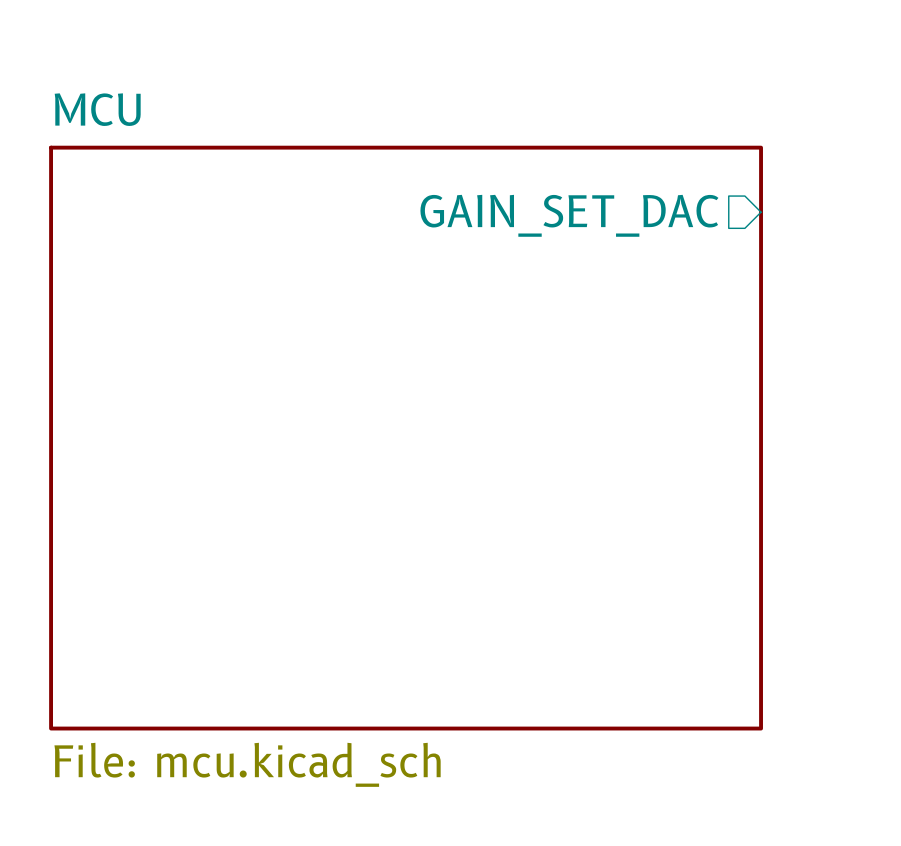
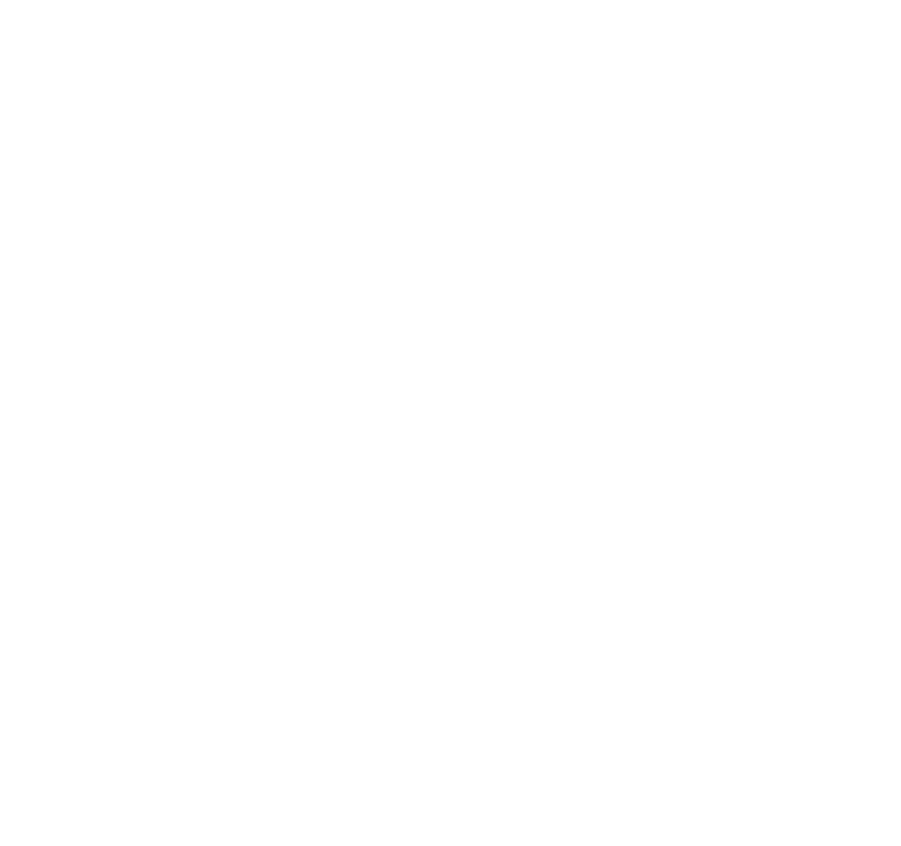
sheet pin: GAIN_SET_DAC (569, 215) -> none
sheet MCU: File: mcu.kicad_sch (406, 438) -> none

